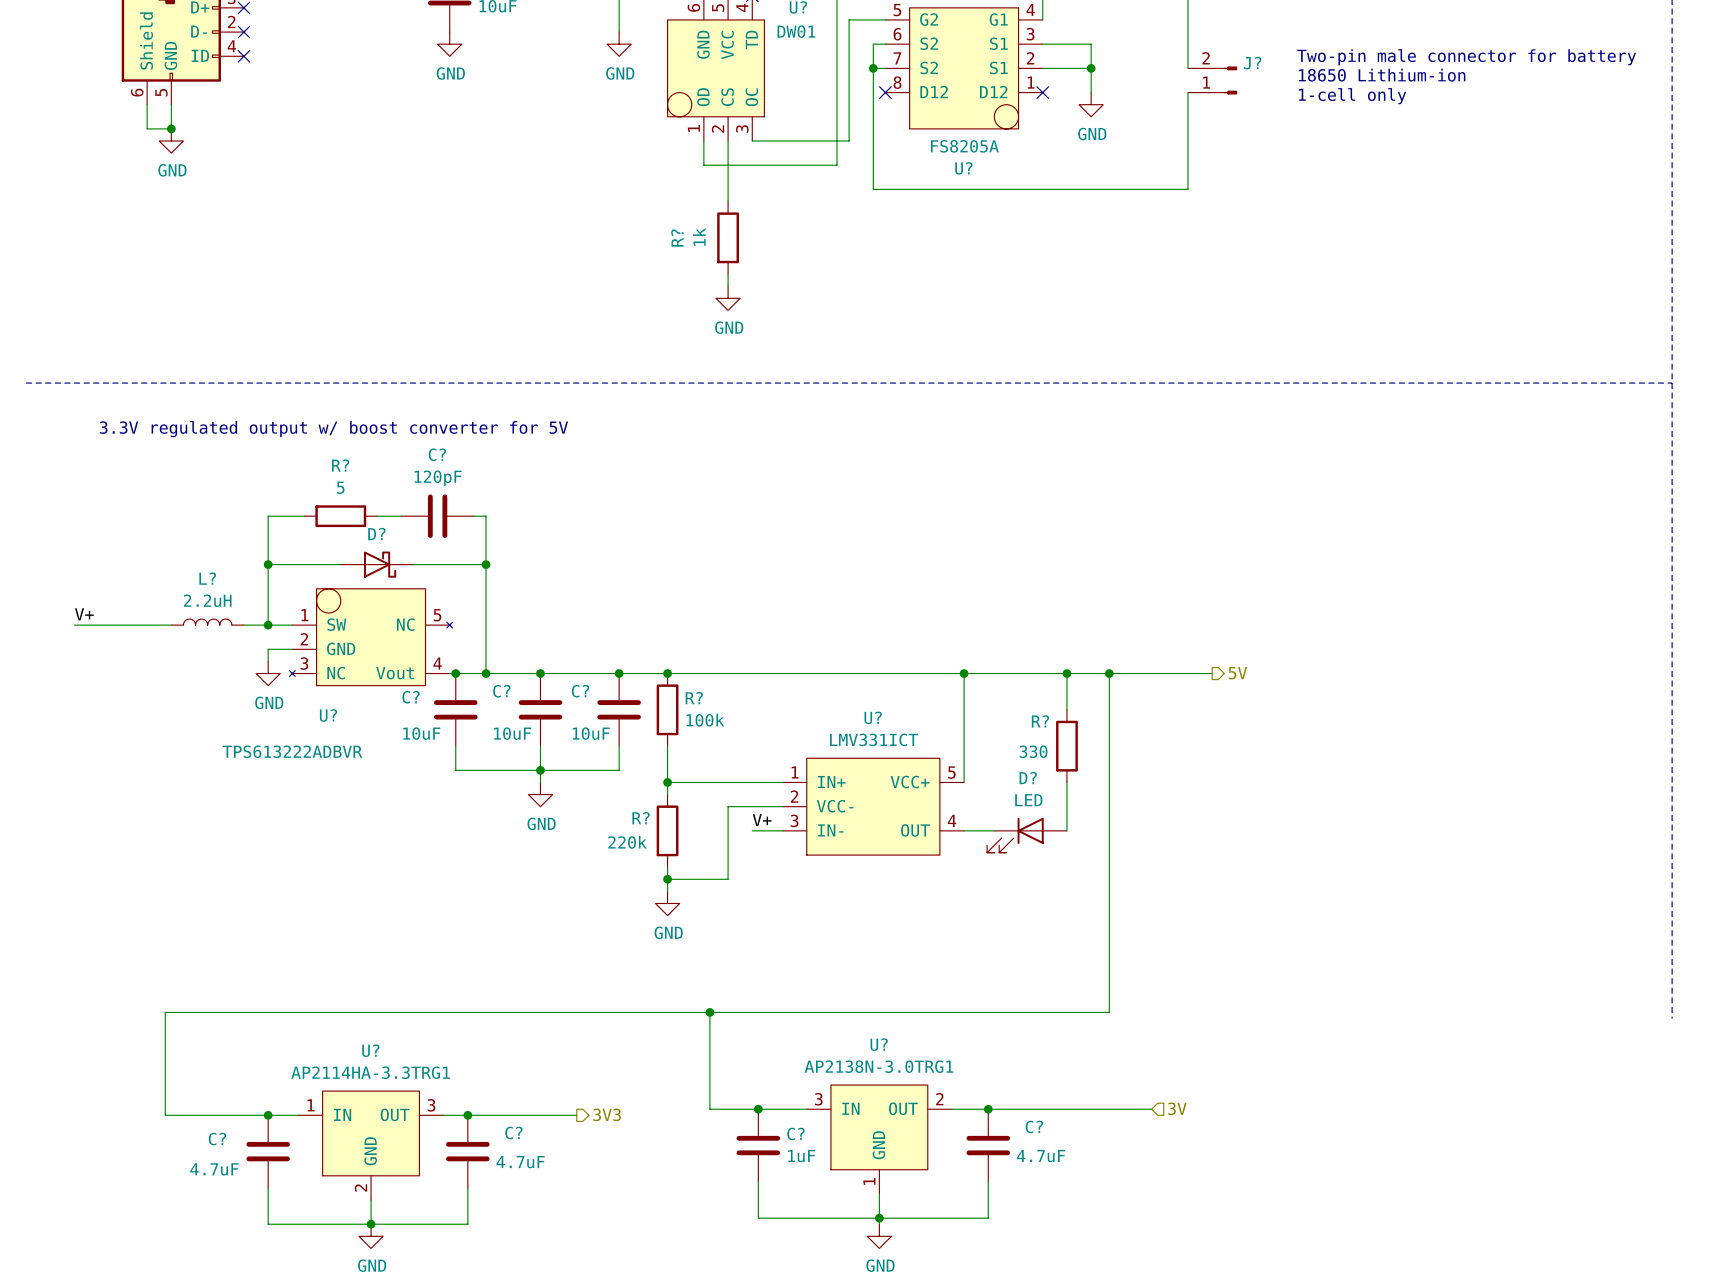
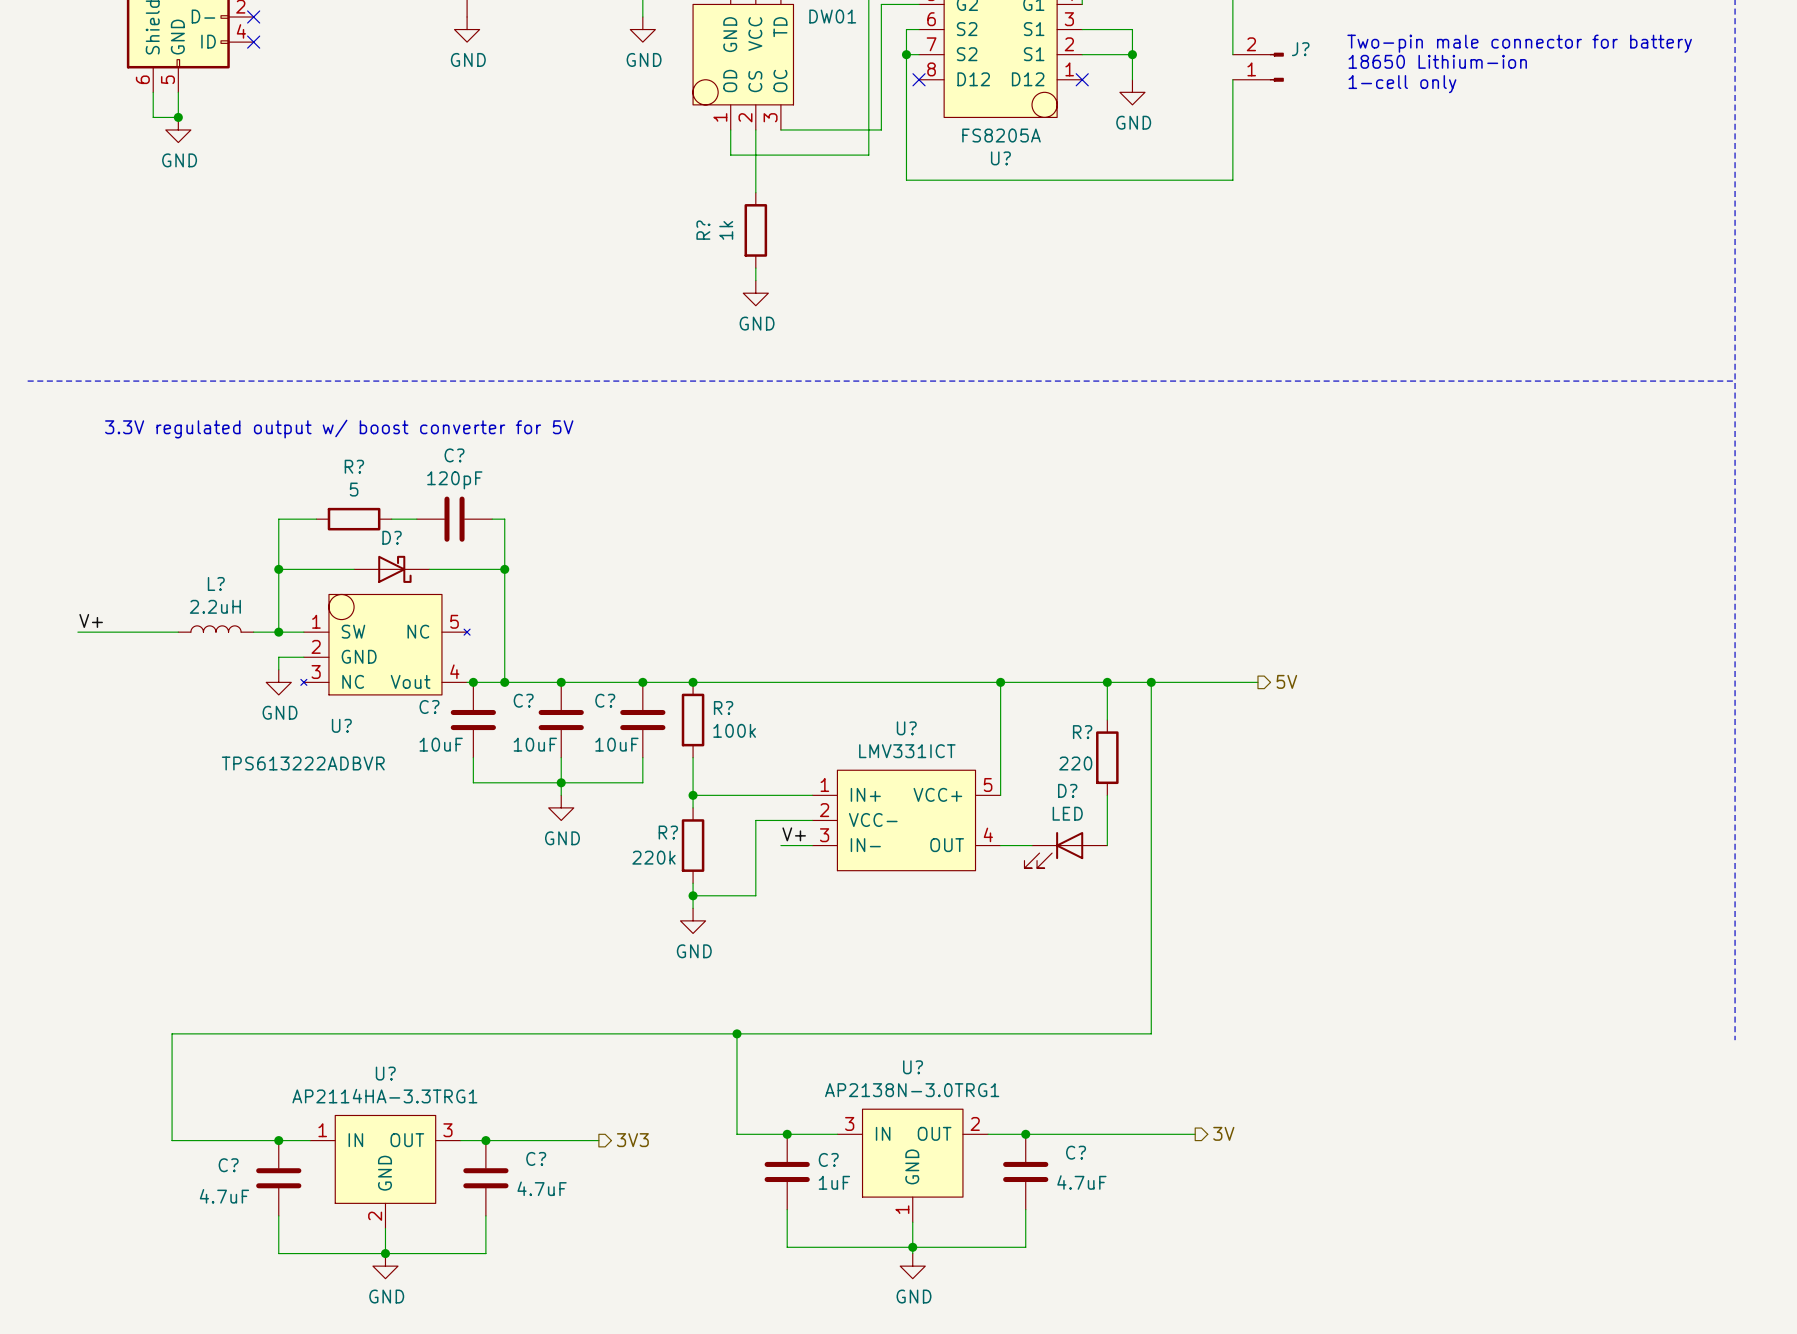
R? value: 330 (1033, 751) -> 220 (1075, 763)
hierarchical label shape: input (1177, 1108) -> output (1223, 1133)

